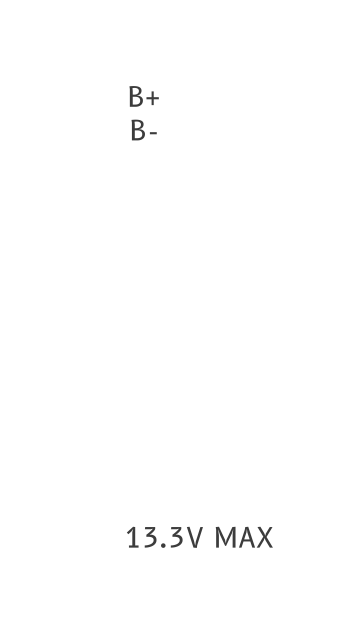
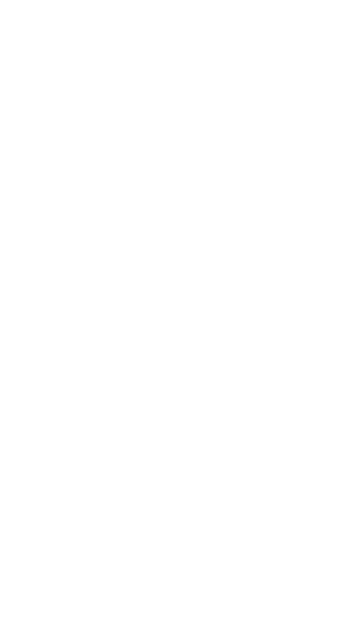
text: B+ (144, 96) -> none
text: B- (144, 130) -> none
text: 13.3V MAX (199, 537) -> none

